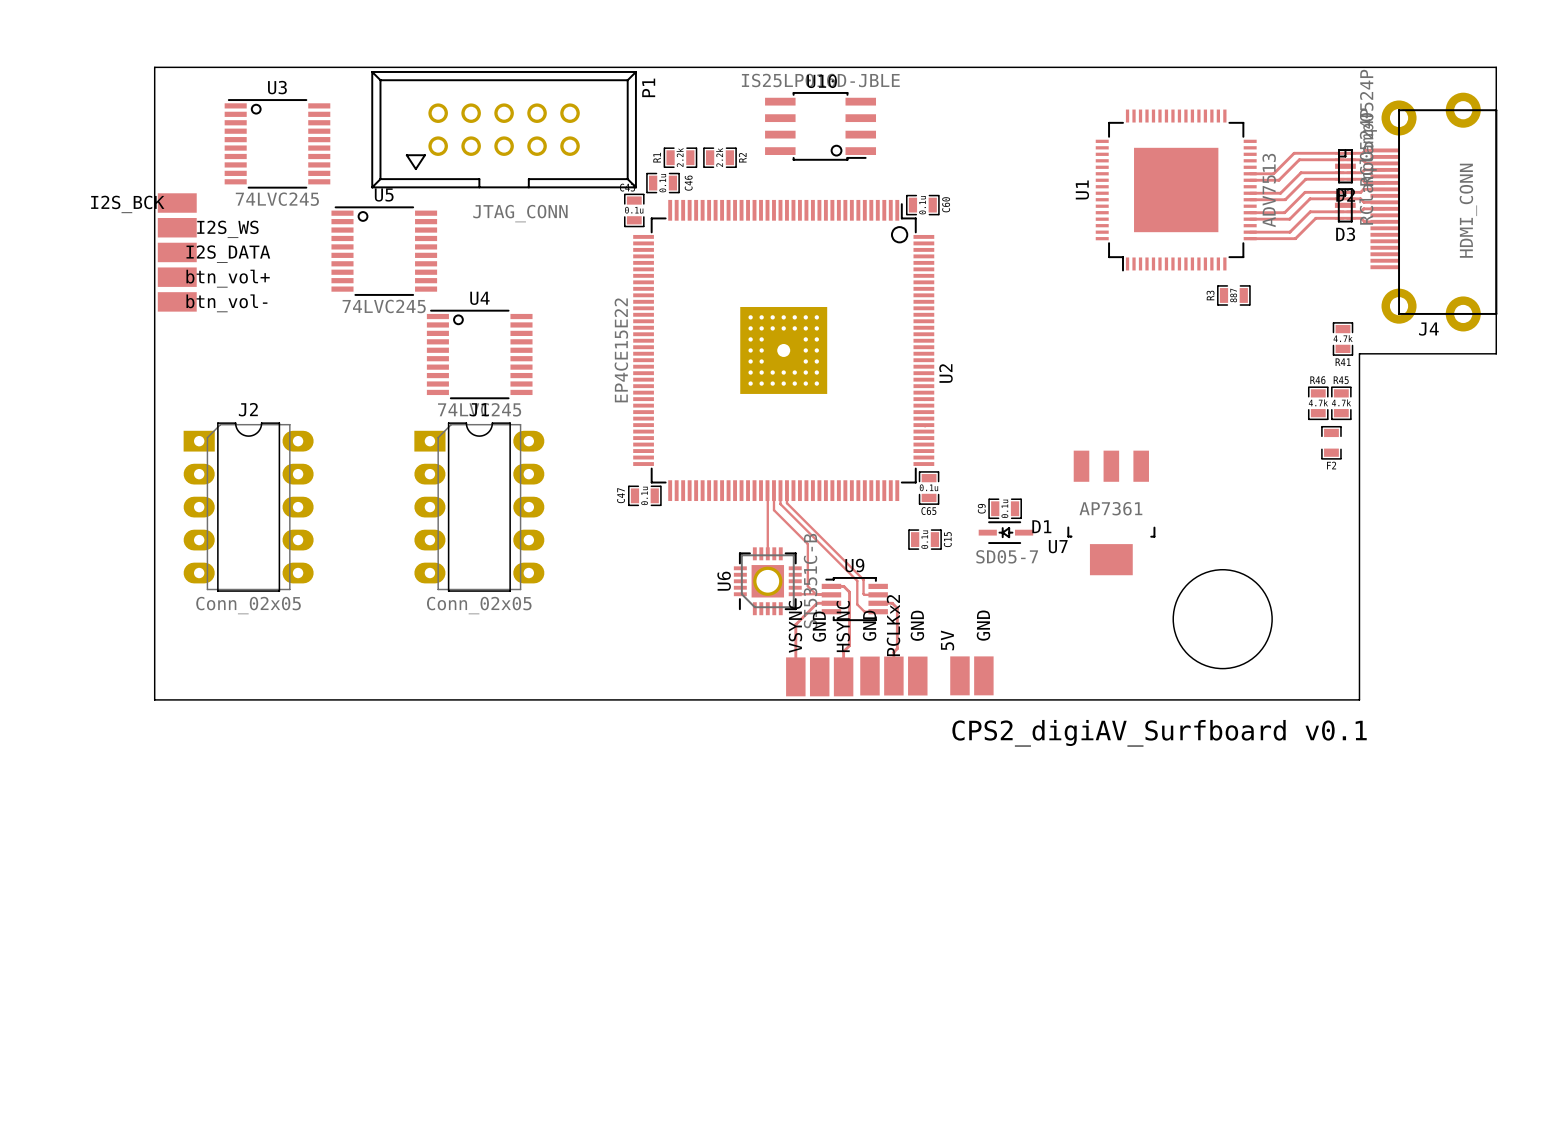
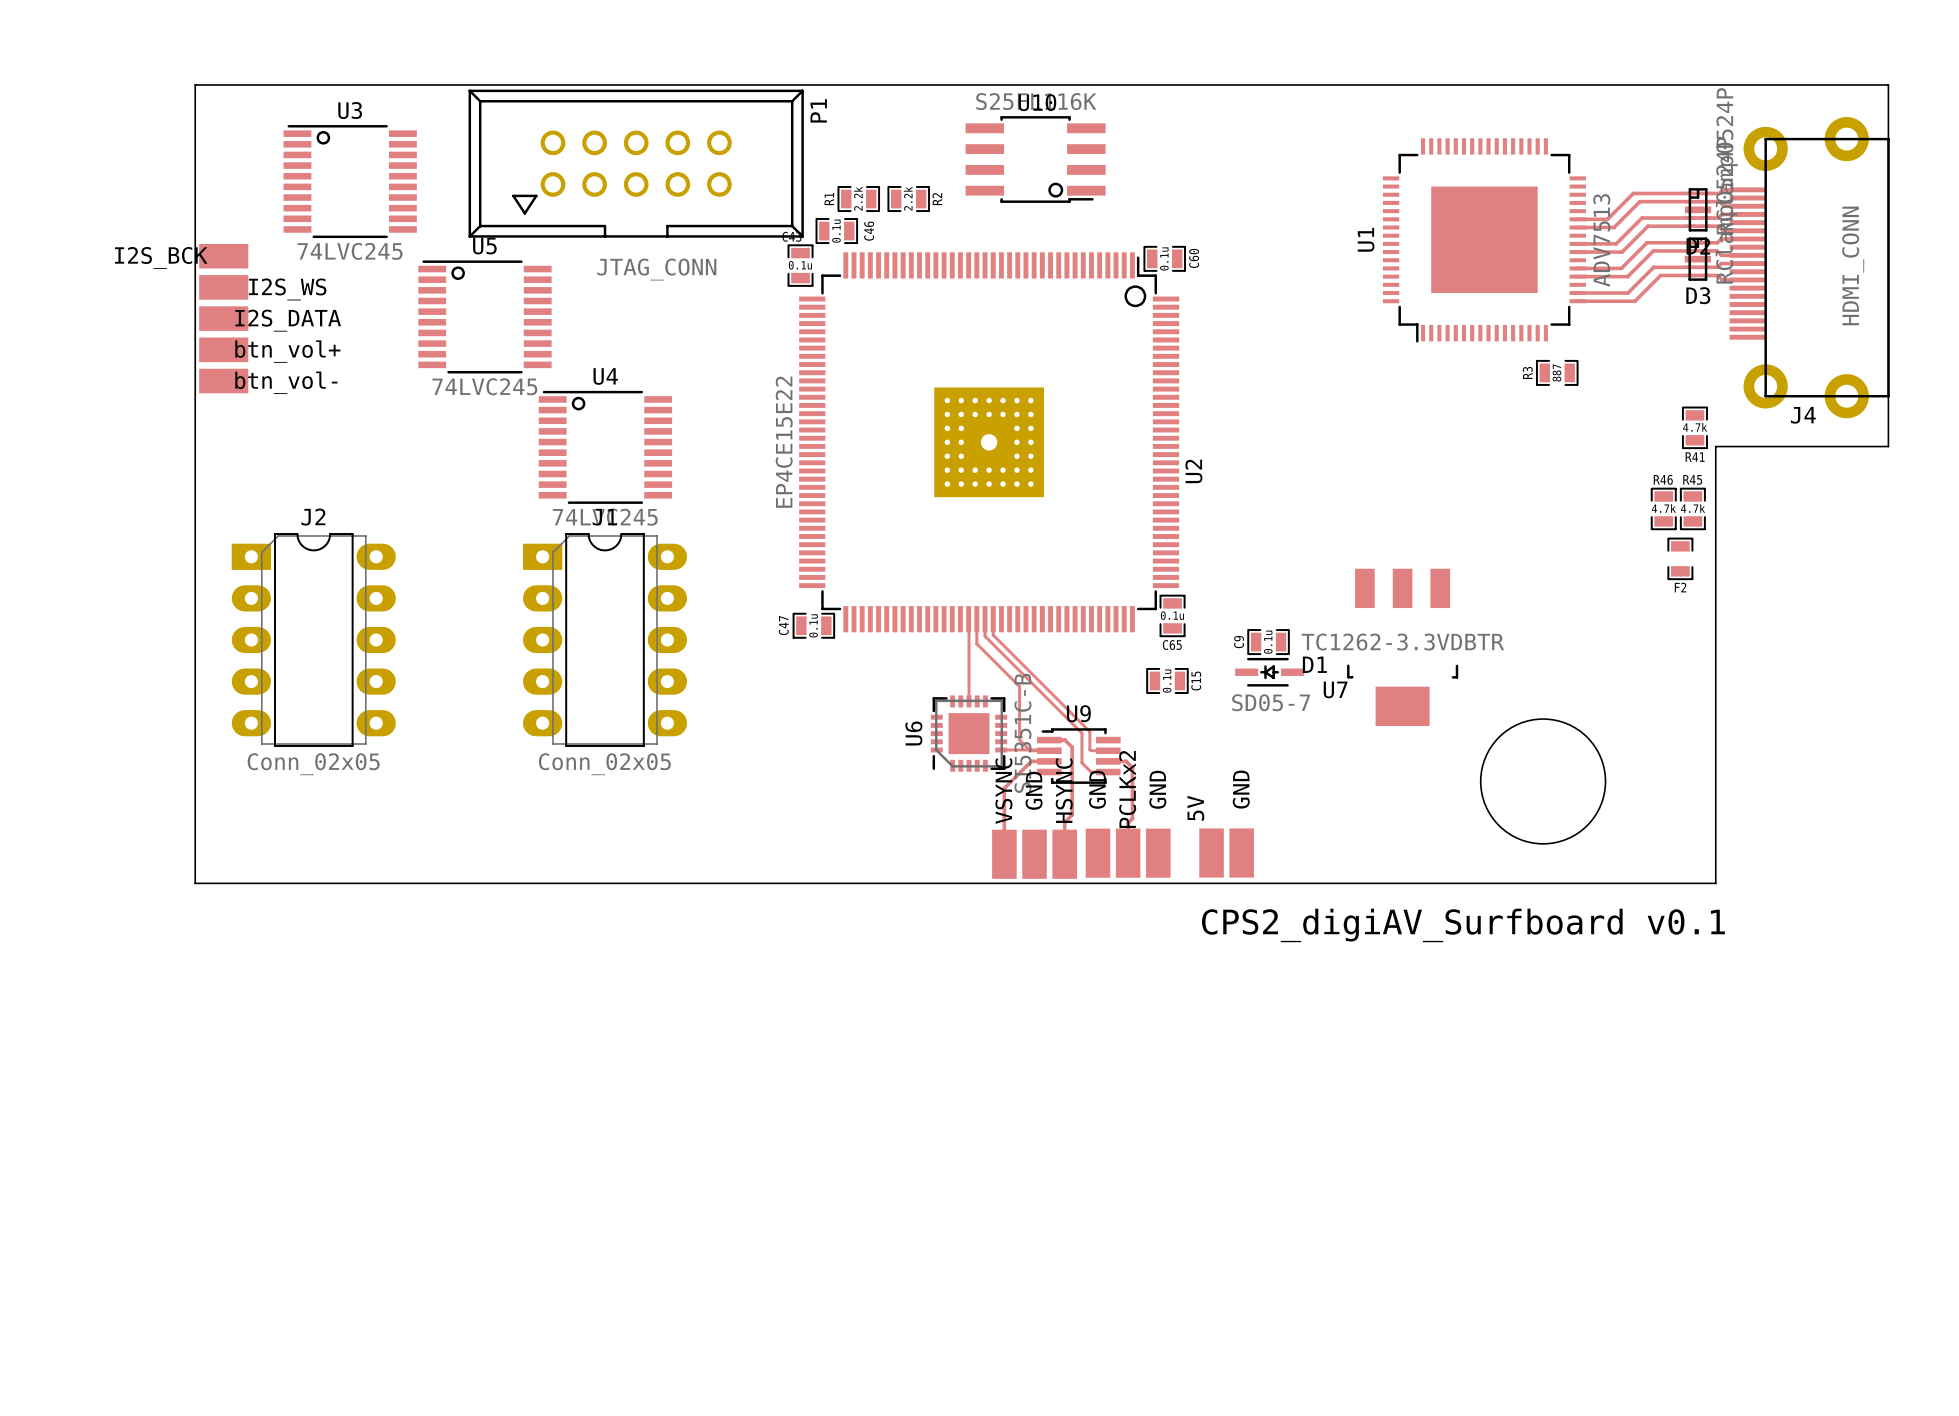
U10 value: IS25LP016D-JBLE (820, 80) -> S25FL116K (1036, 101)
U7 value: AP7361 (1110, 508) -> TC1262-3.3VDBTR (1402, 642)
U6 footprint: [733, 547, 802, 616] -> [930, 695, 1008, 772]

